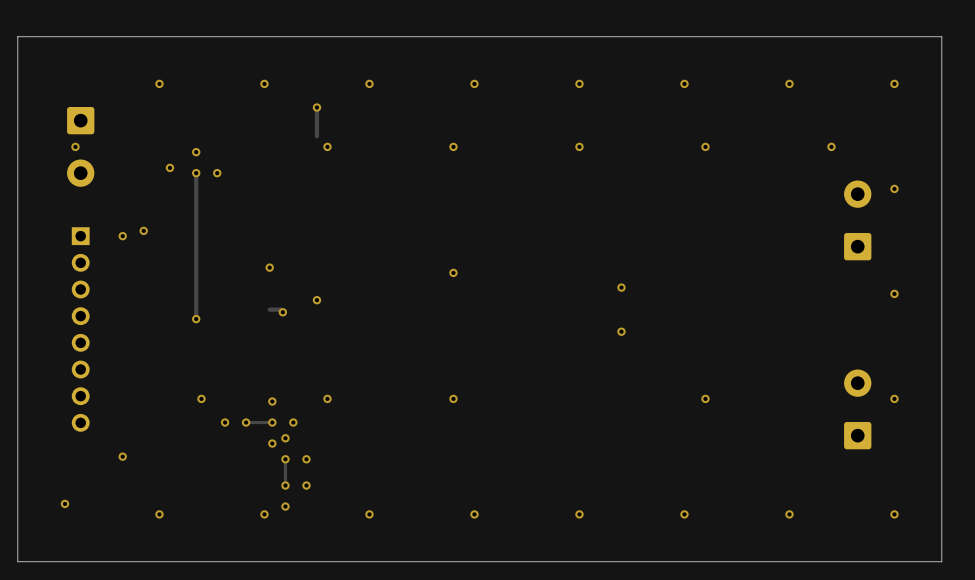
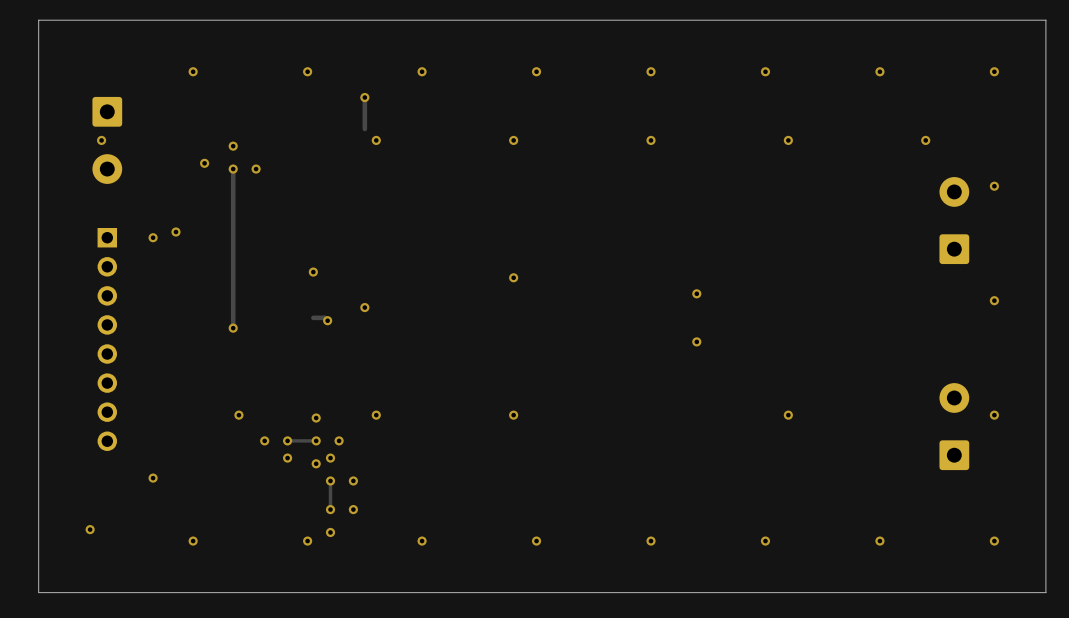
via: none -> (287, 458)

